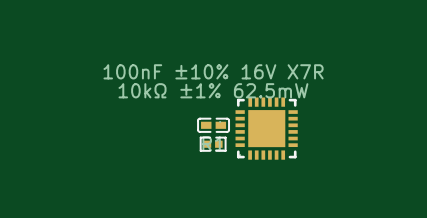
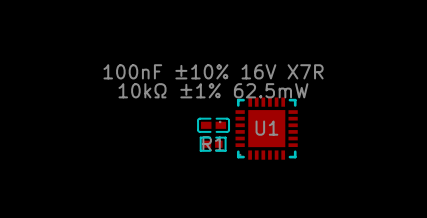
U1 name: none -> U1 (266, 128)

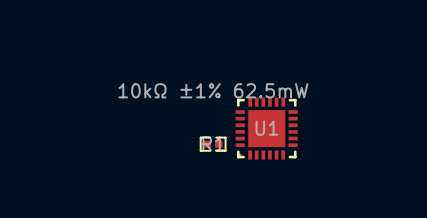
part: 100nF ±10% 16V X7R (213, 125) -> none

